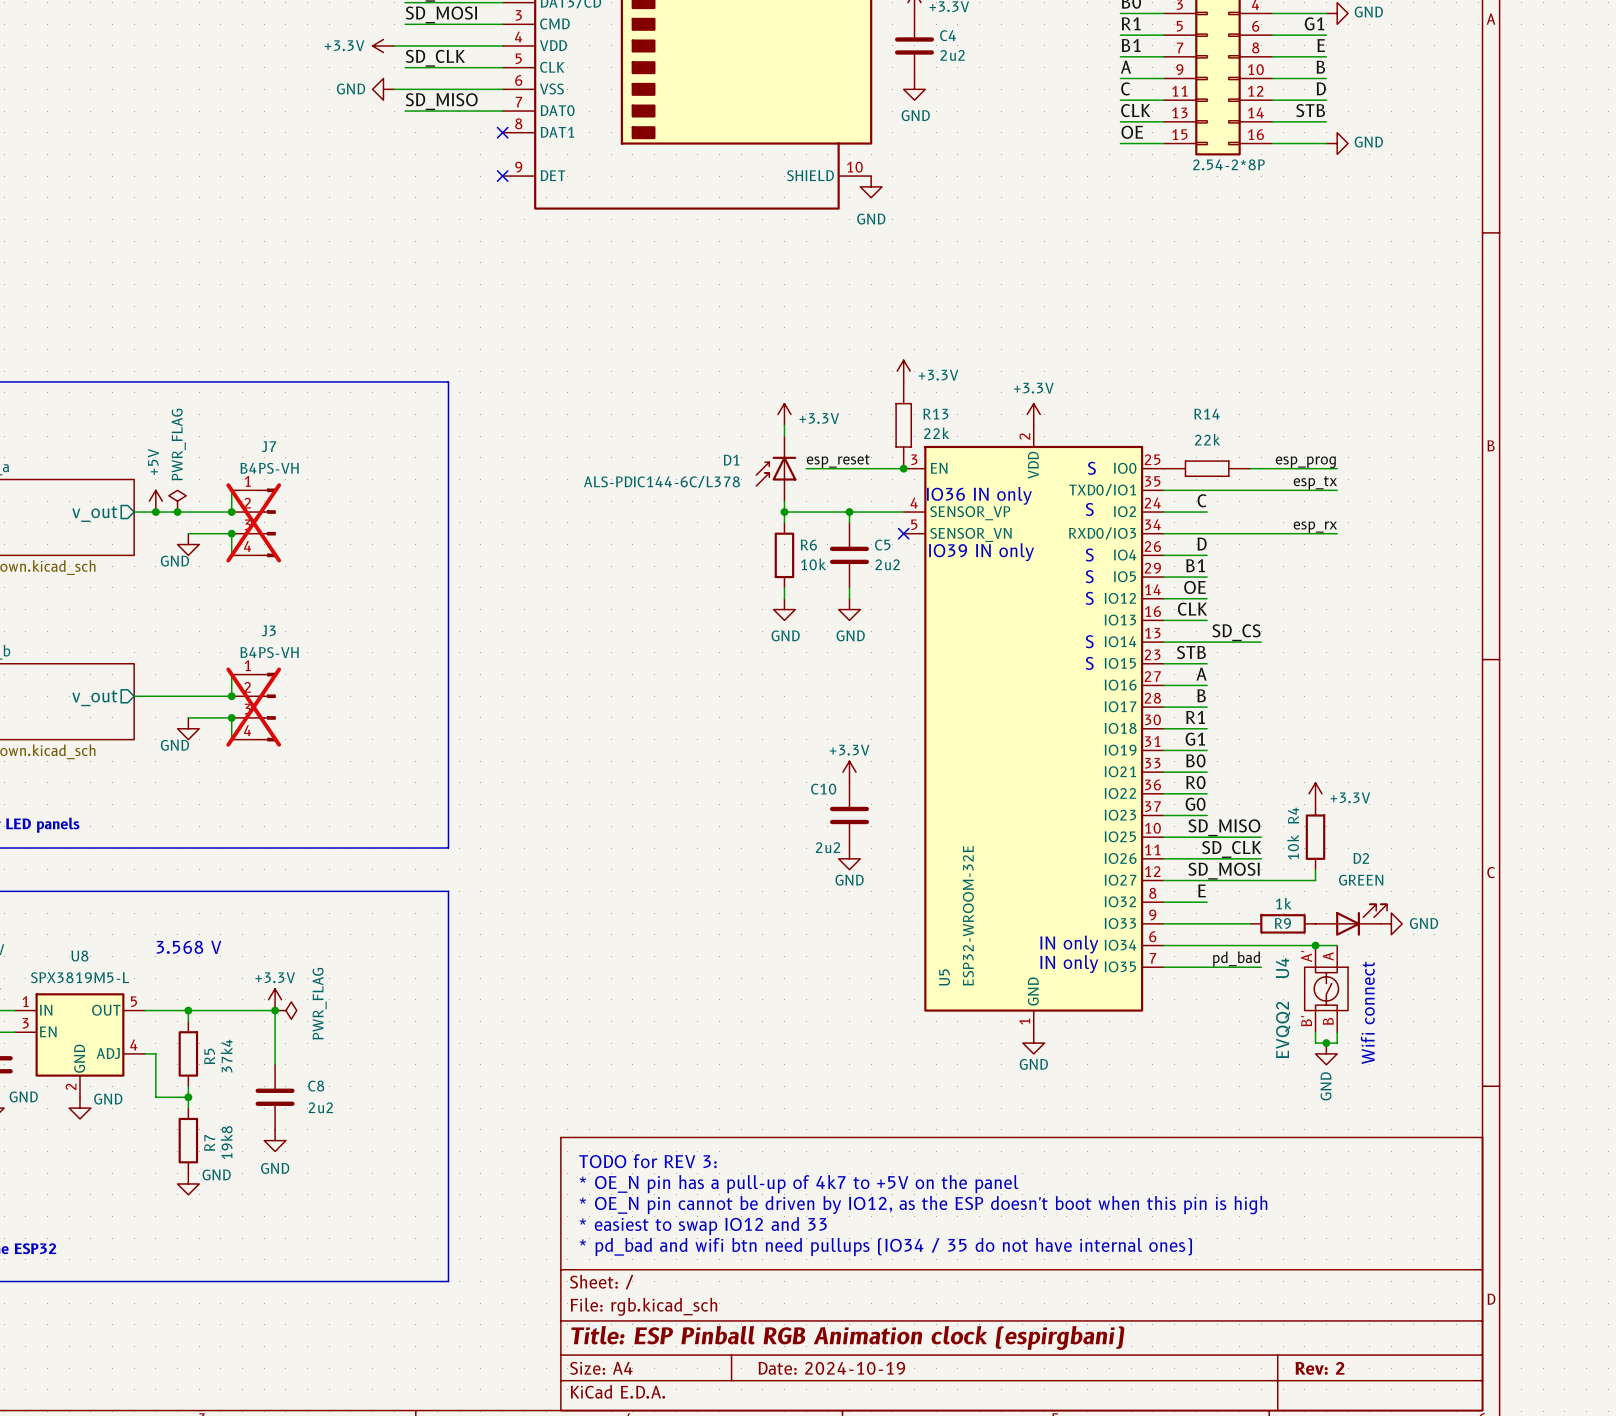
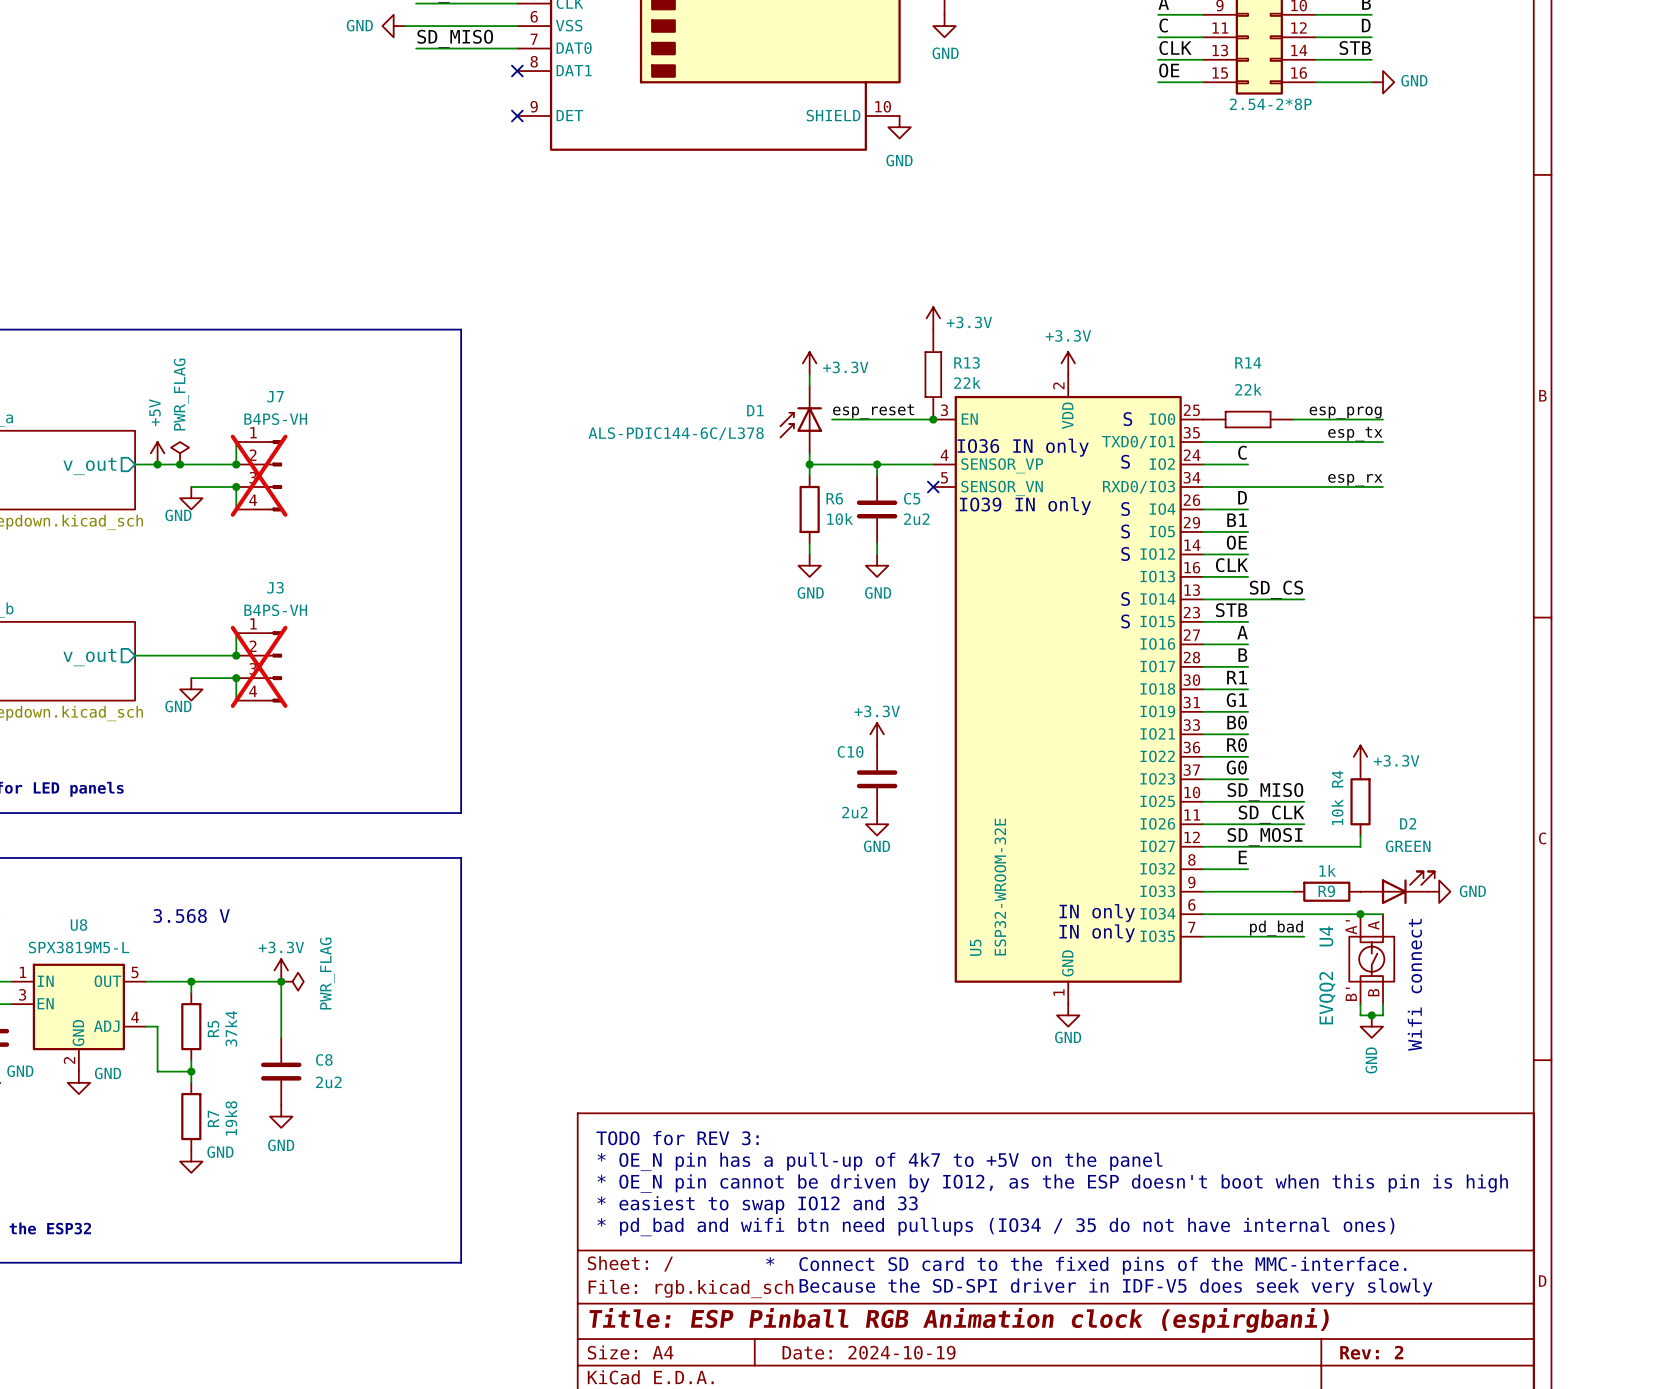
text: none -> * Connect SD card to the fixed pins of the MMC-interface. (1086, 1265)
text: none -> Because the SD-SPI driver in IDF-V5 does seek very slowly (1115, 1287)

